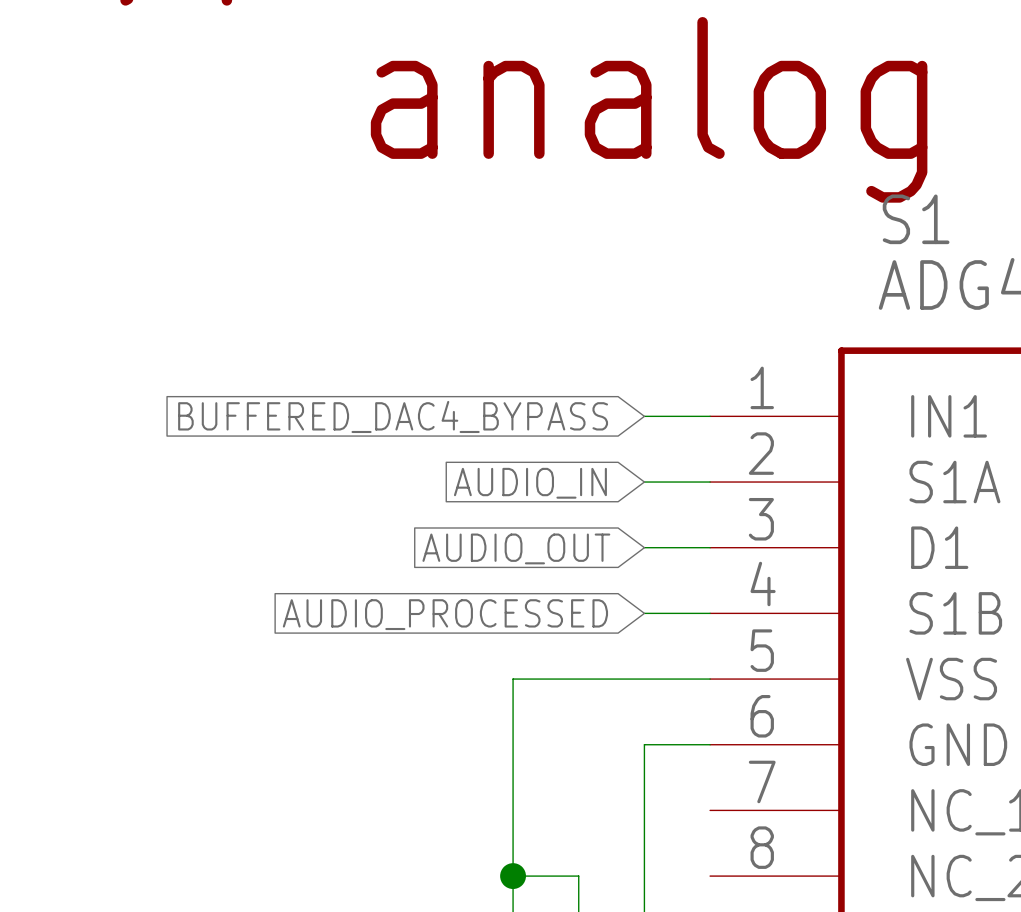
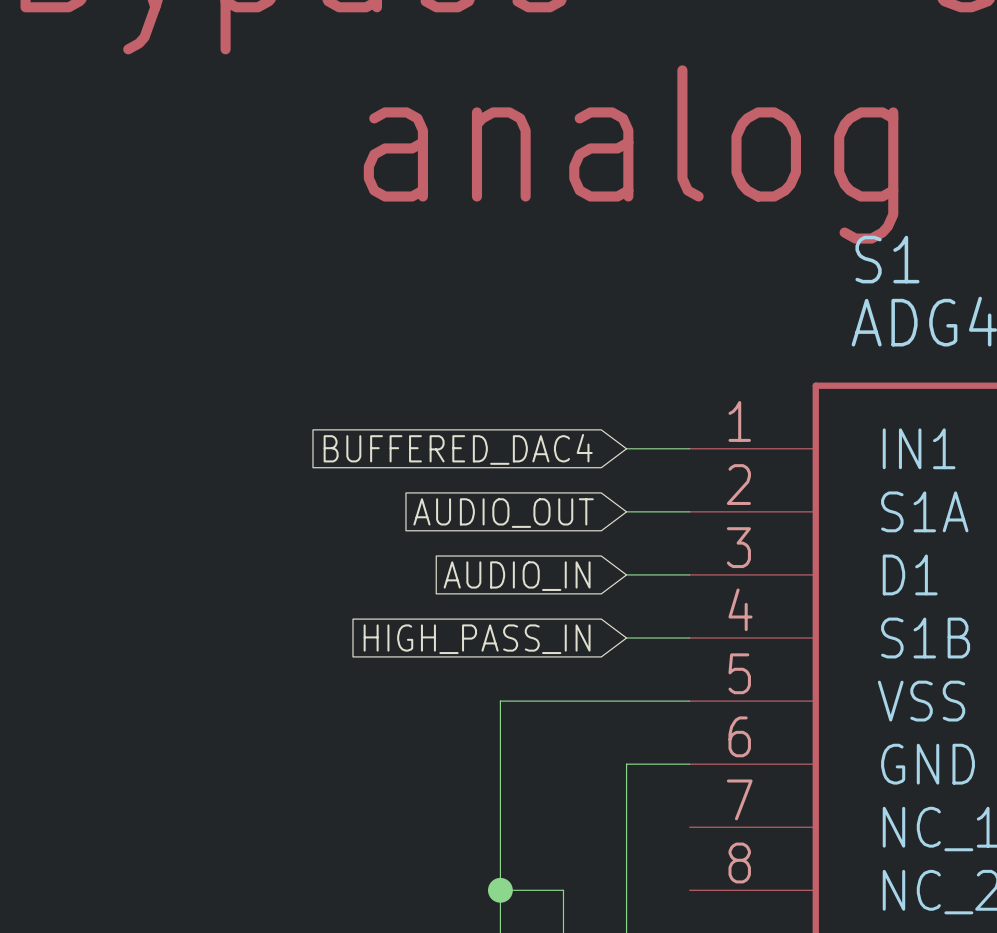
global label: BUFFERED_DAC4_BYPASS (393, 416) -> BUFFERED_DAC4 (458, 449)
global label: AUDIO_IN (530, 483) -> AUDIO_OUT (503, 513)
global label: AUDIO_OUT (516, 548) -> AUDIO_IN (517, 576)
global label: AUDIO_PROCESSED (445, 614) -> HIGH_PASS_IN (477, 639)

